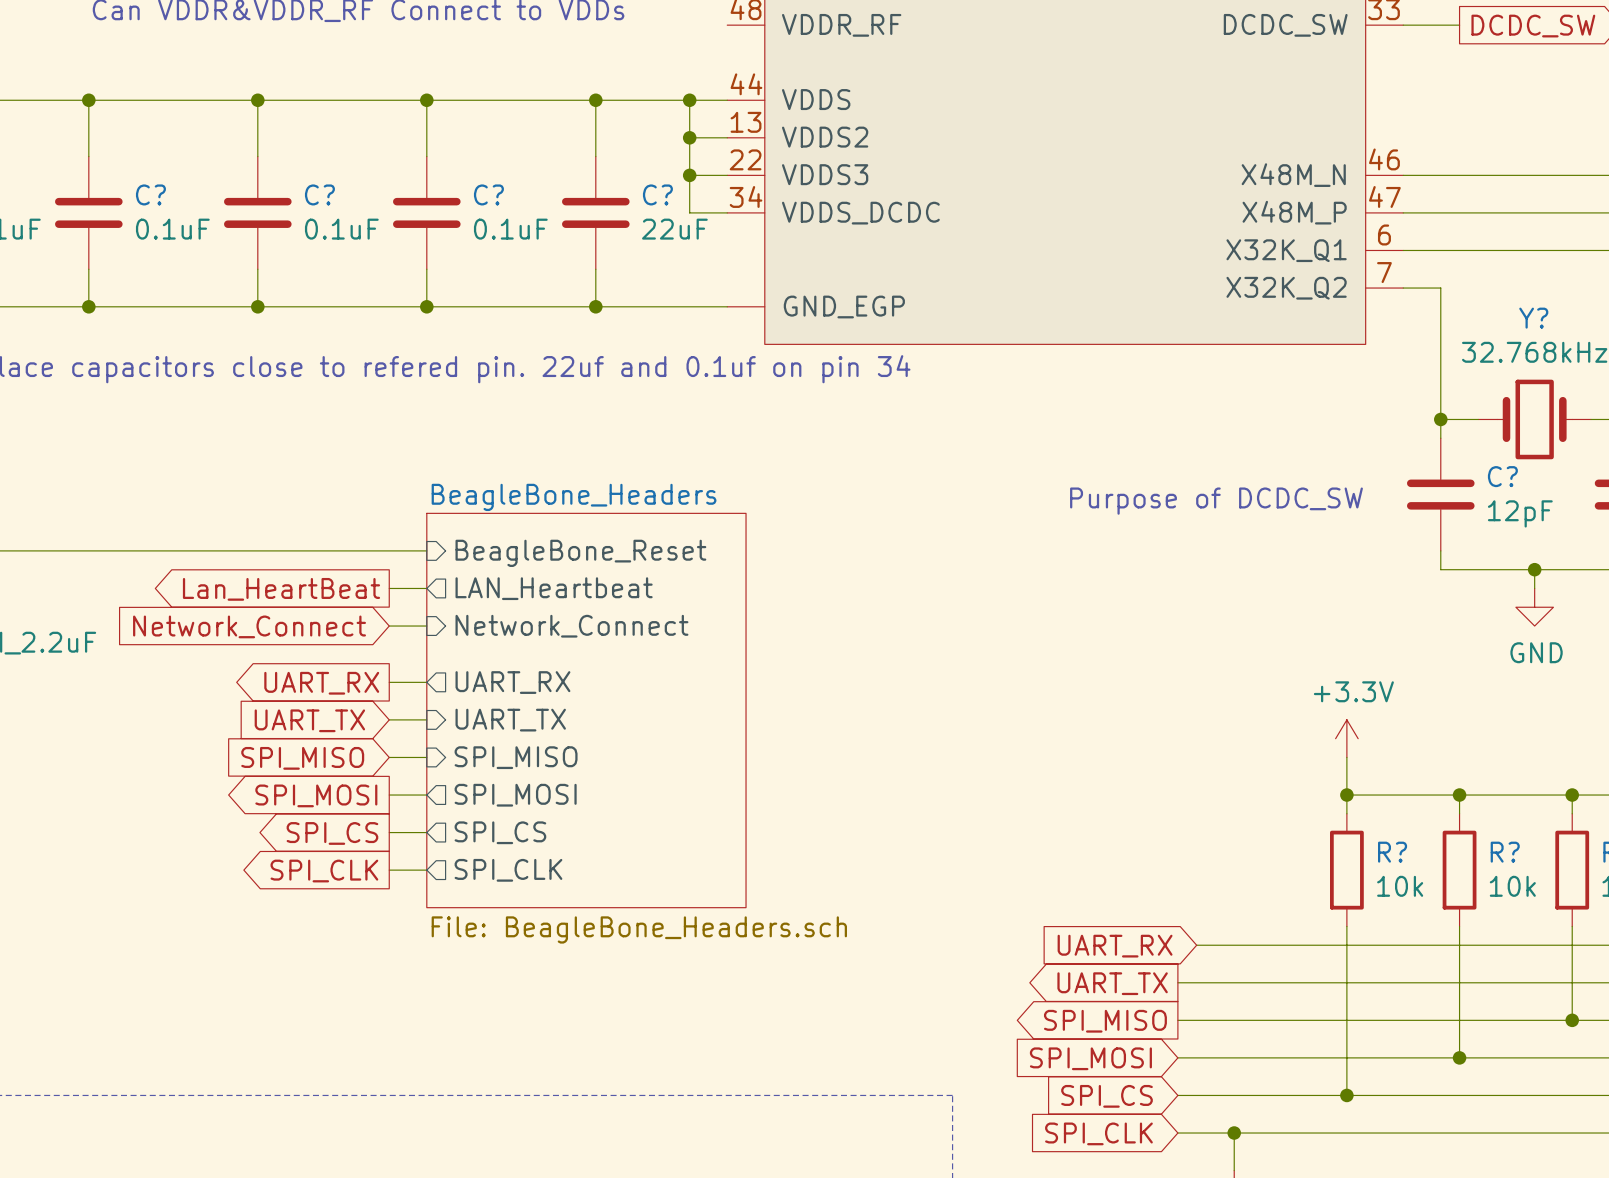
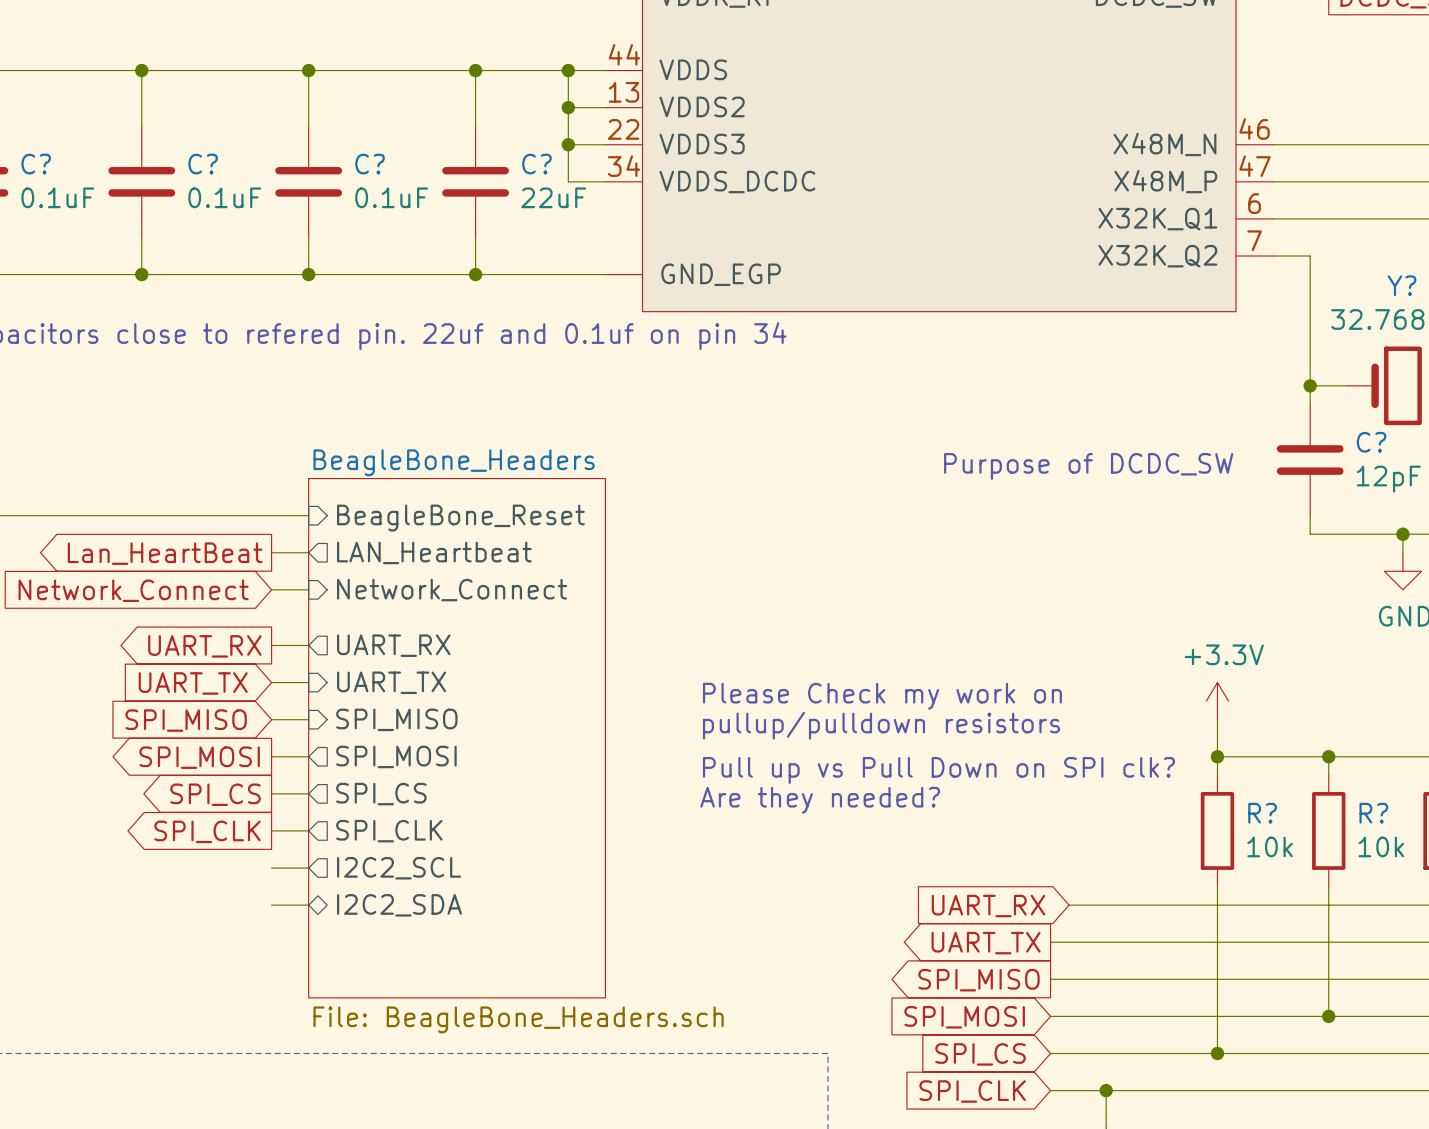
sheet BeagleBone_Headers: File: BeagleBone_Headers.sch (586, 710) -> none
text: none -> Please Check my work on (882, 696)
text: none -> pullup/pulldown resistors (881, 725)
sheet BeagleBone_Headers: none -> File: BeagleBone_Headers.sch (457, 738)
text: none -> Pull up vs Pull Down on SPI clk? (938, 770)
text: none -> Are they needed? (820, 800)
wire: none -> (271, 868) (308, 868)
sheet pin: none -> I2C2_SCL (399, 868)
wire: none -> (271, 905) (308, 905)
sheet pin: none -> I2C2_SDA (399, 905)

